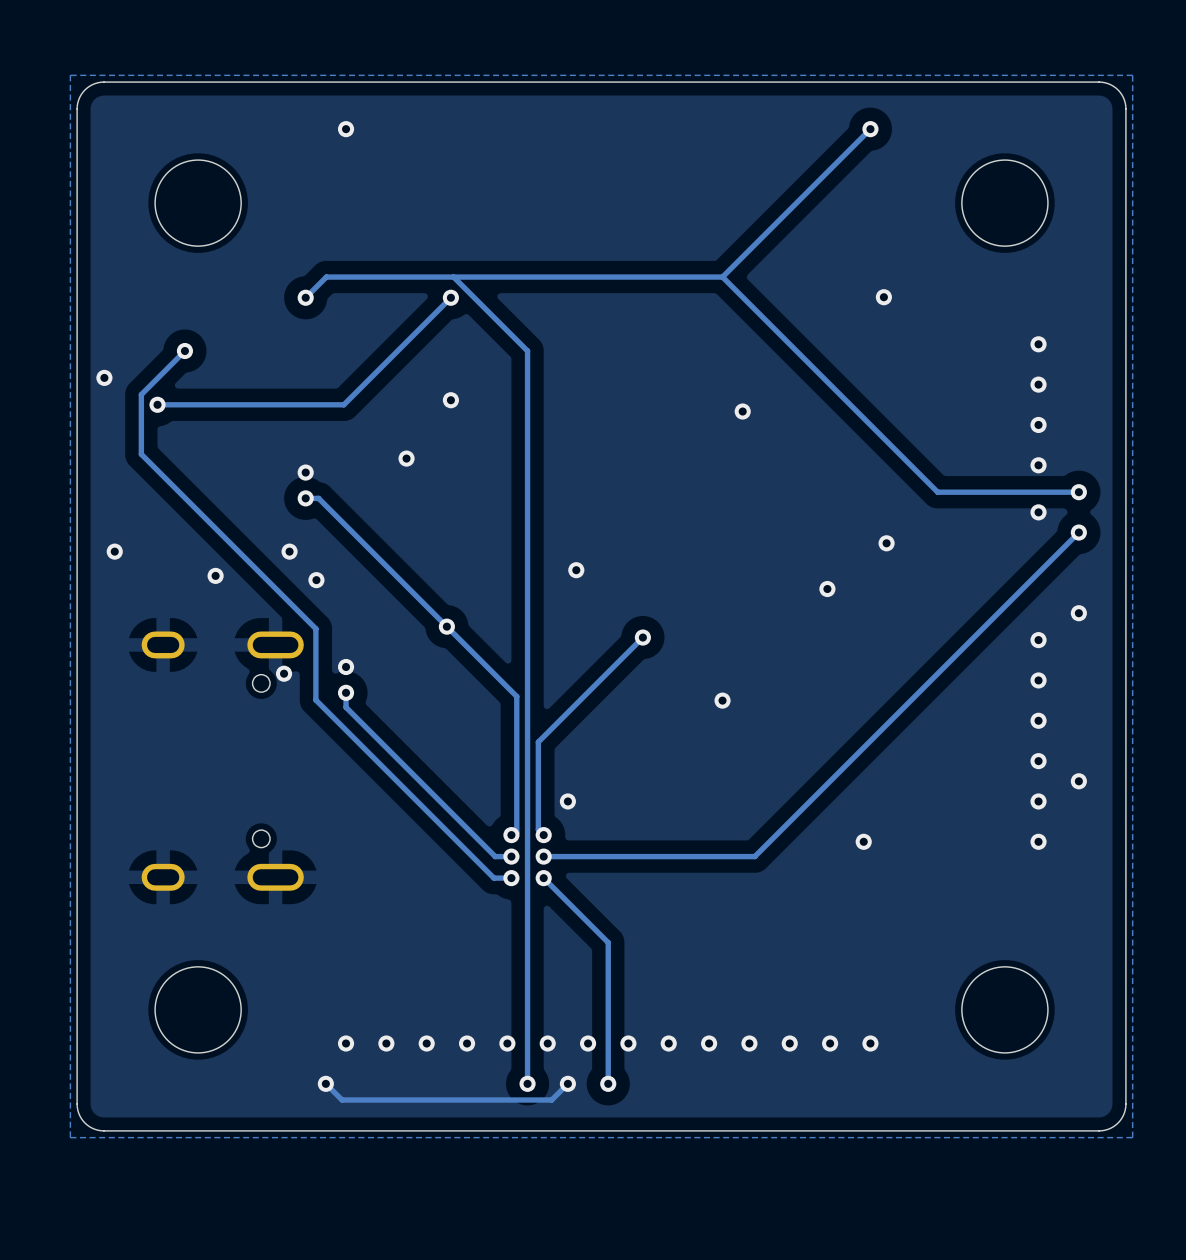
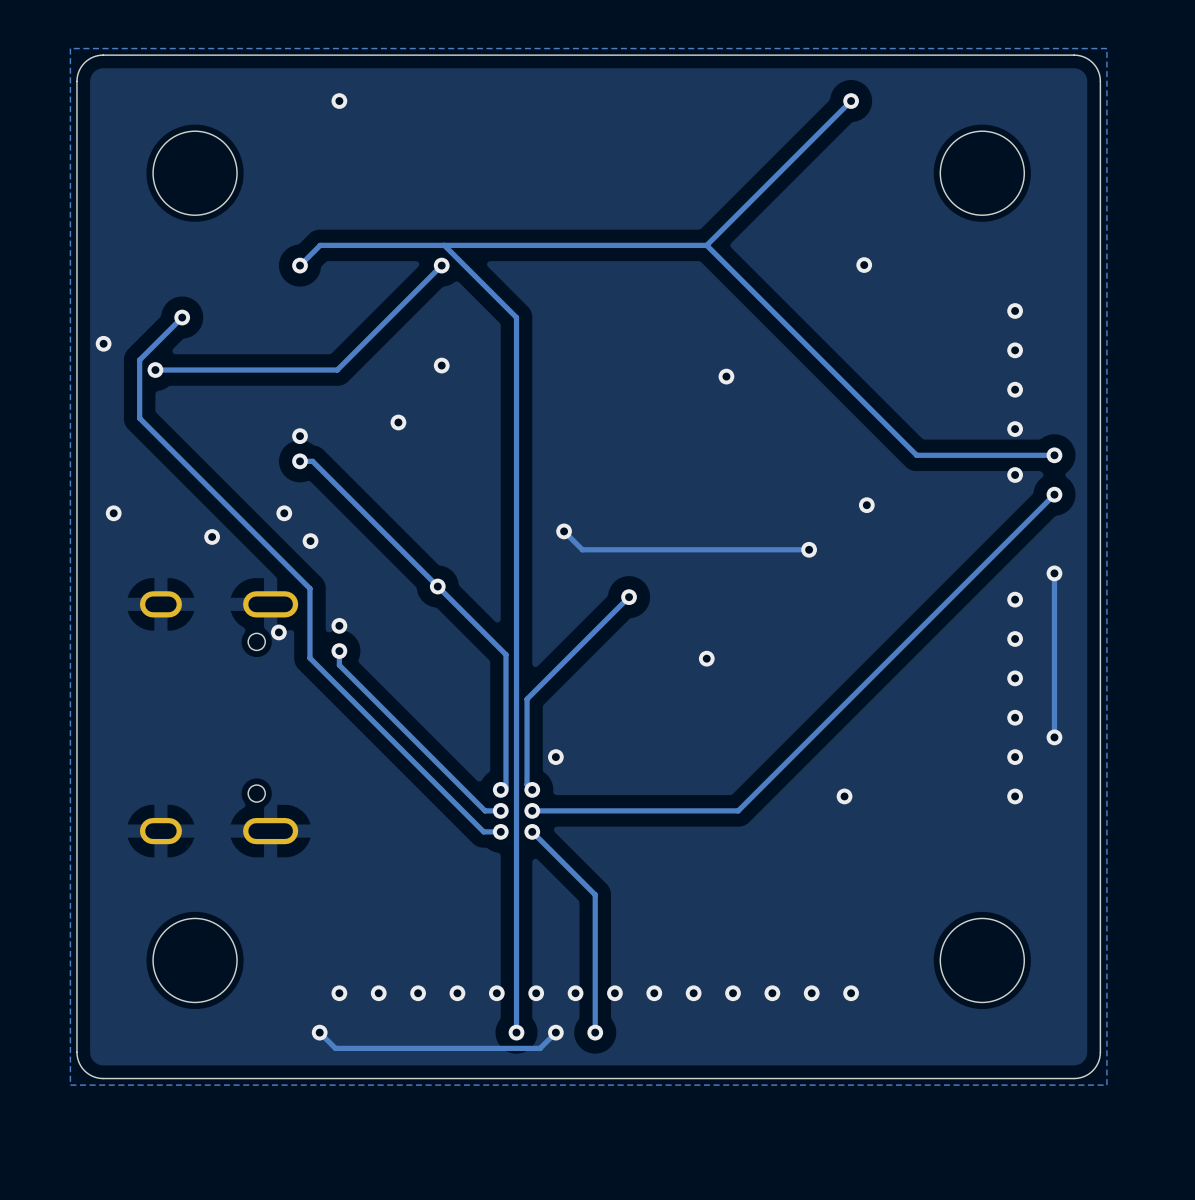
track: none -> (564, 531) (582, 549) (809, 549)
track: none -> (1054, 573) (1054, 737)

